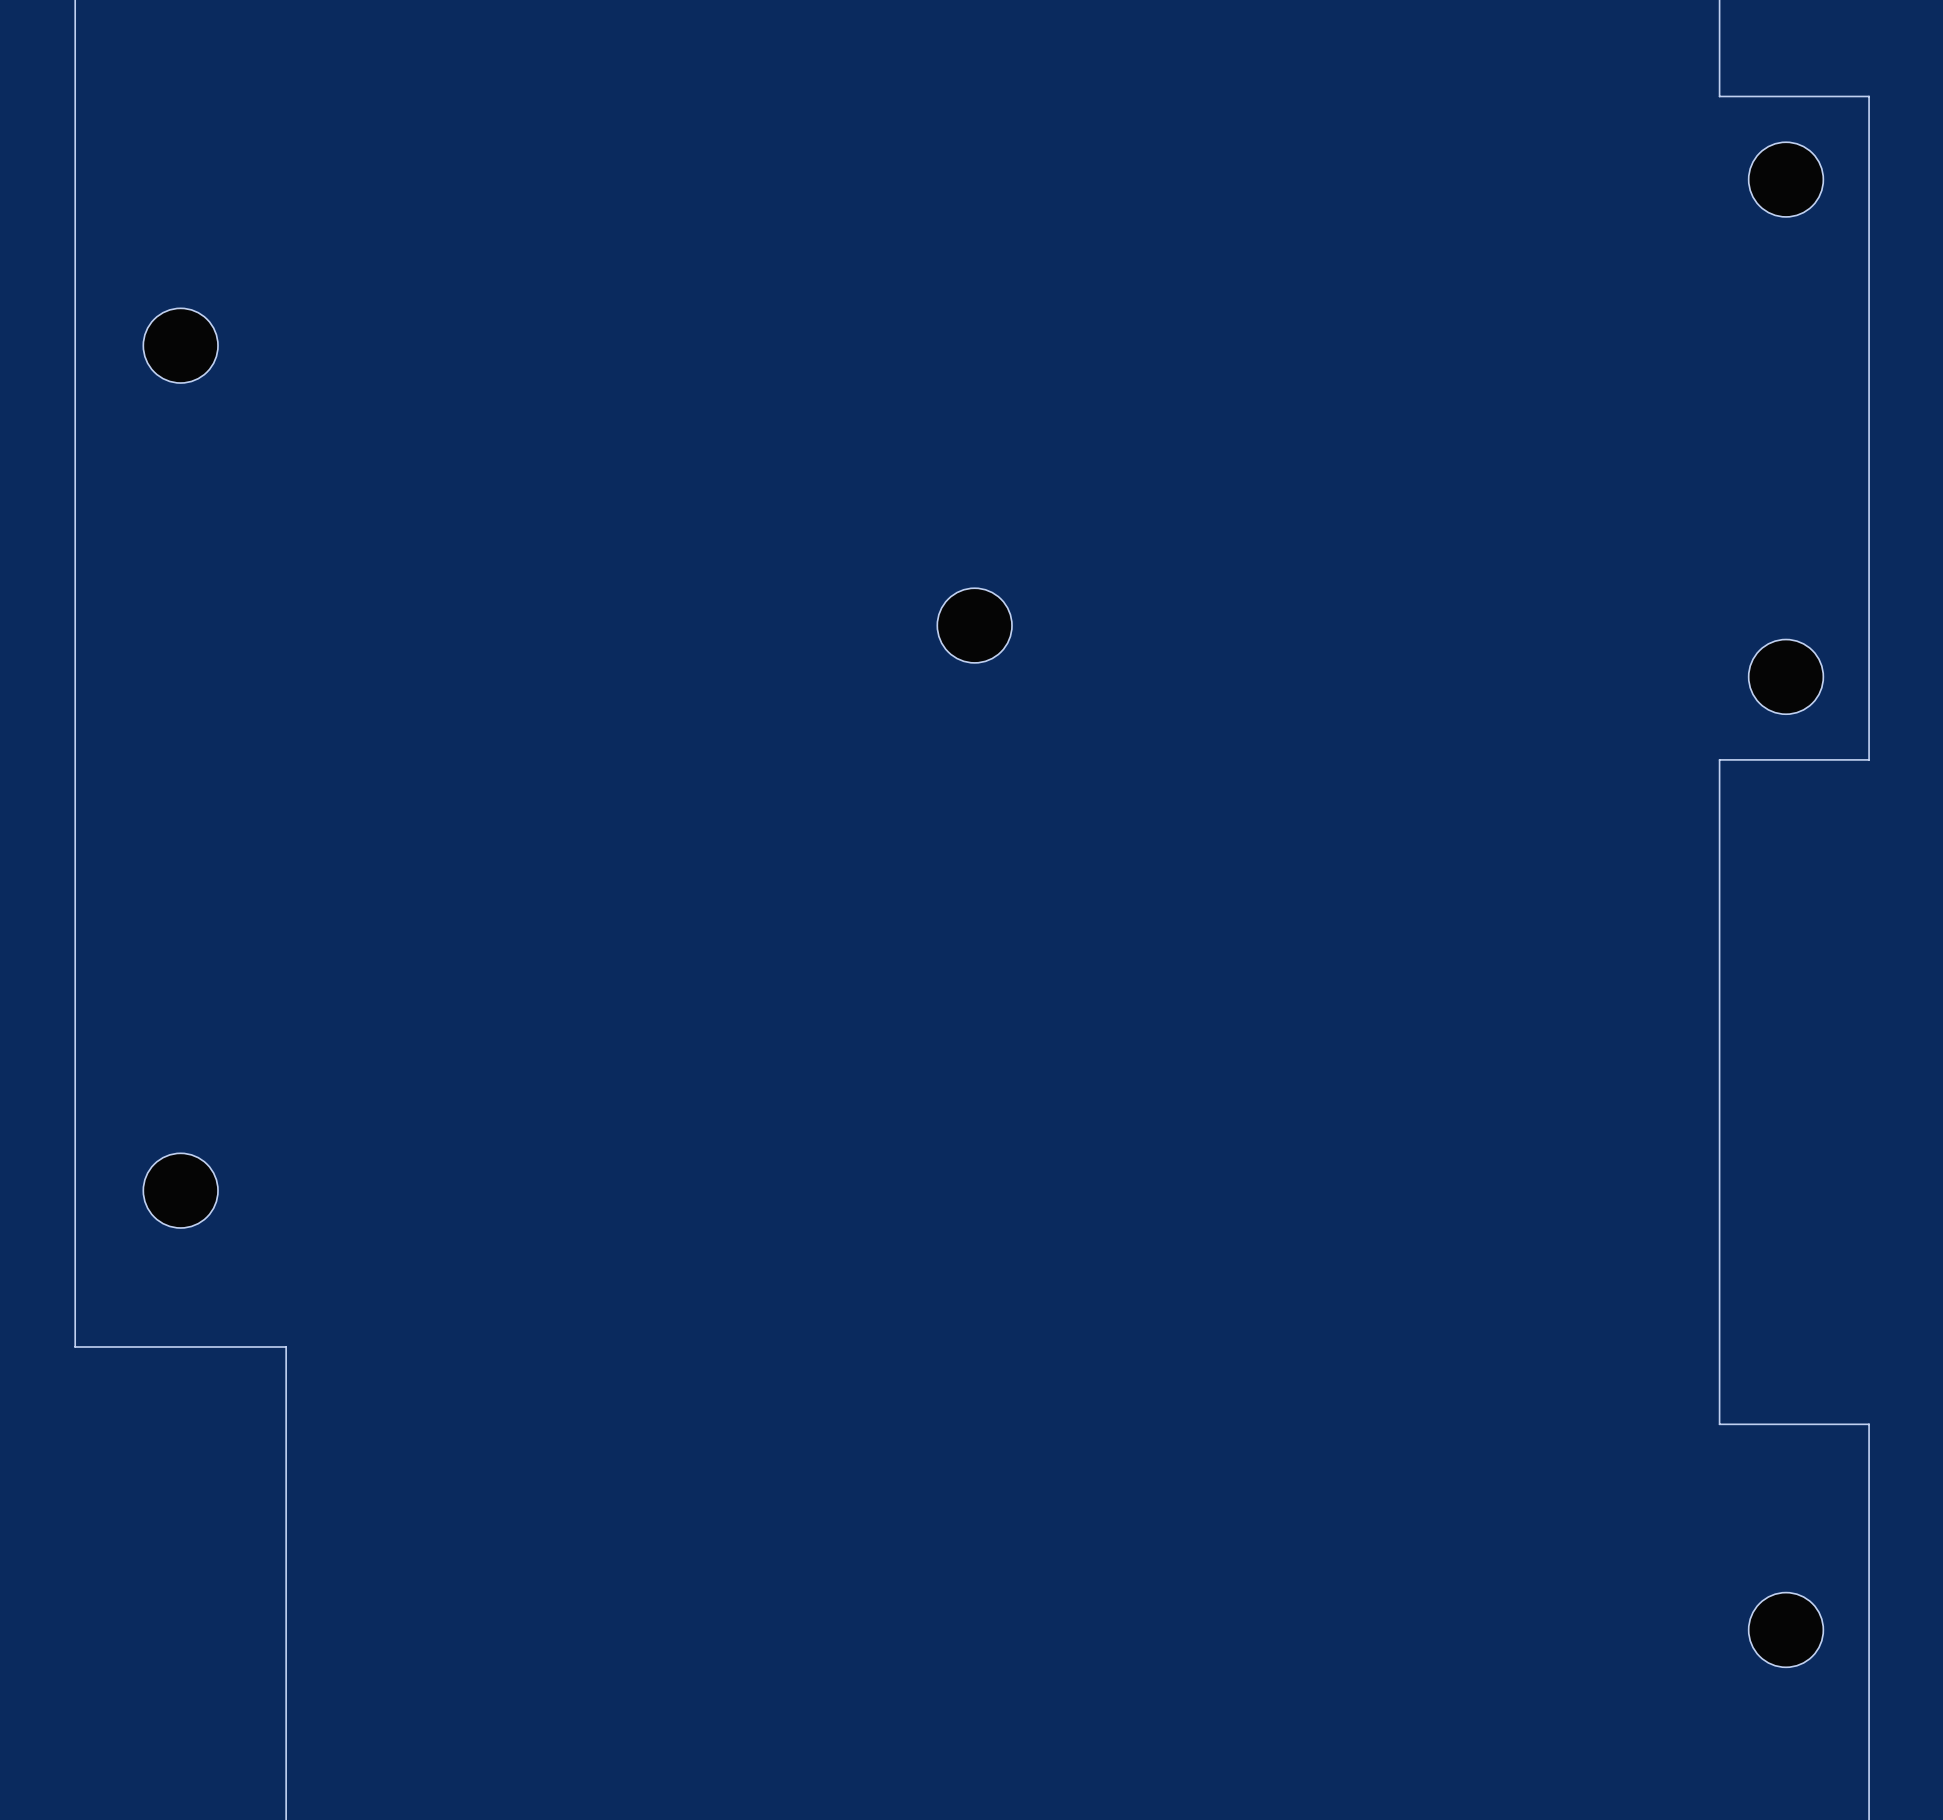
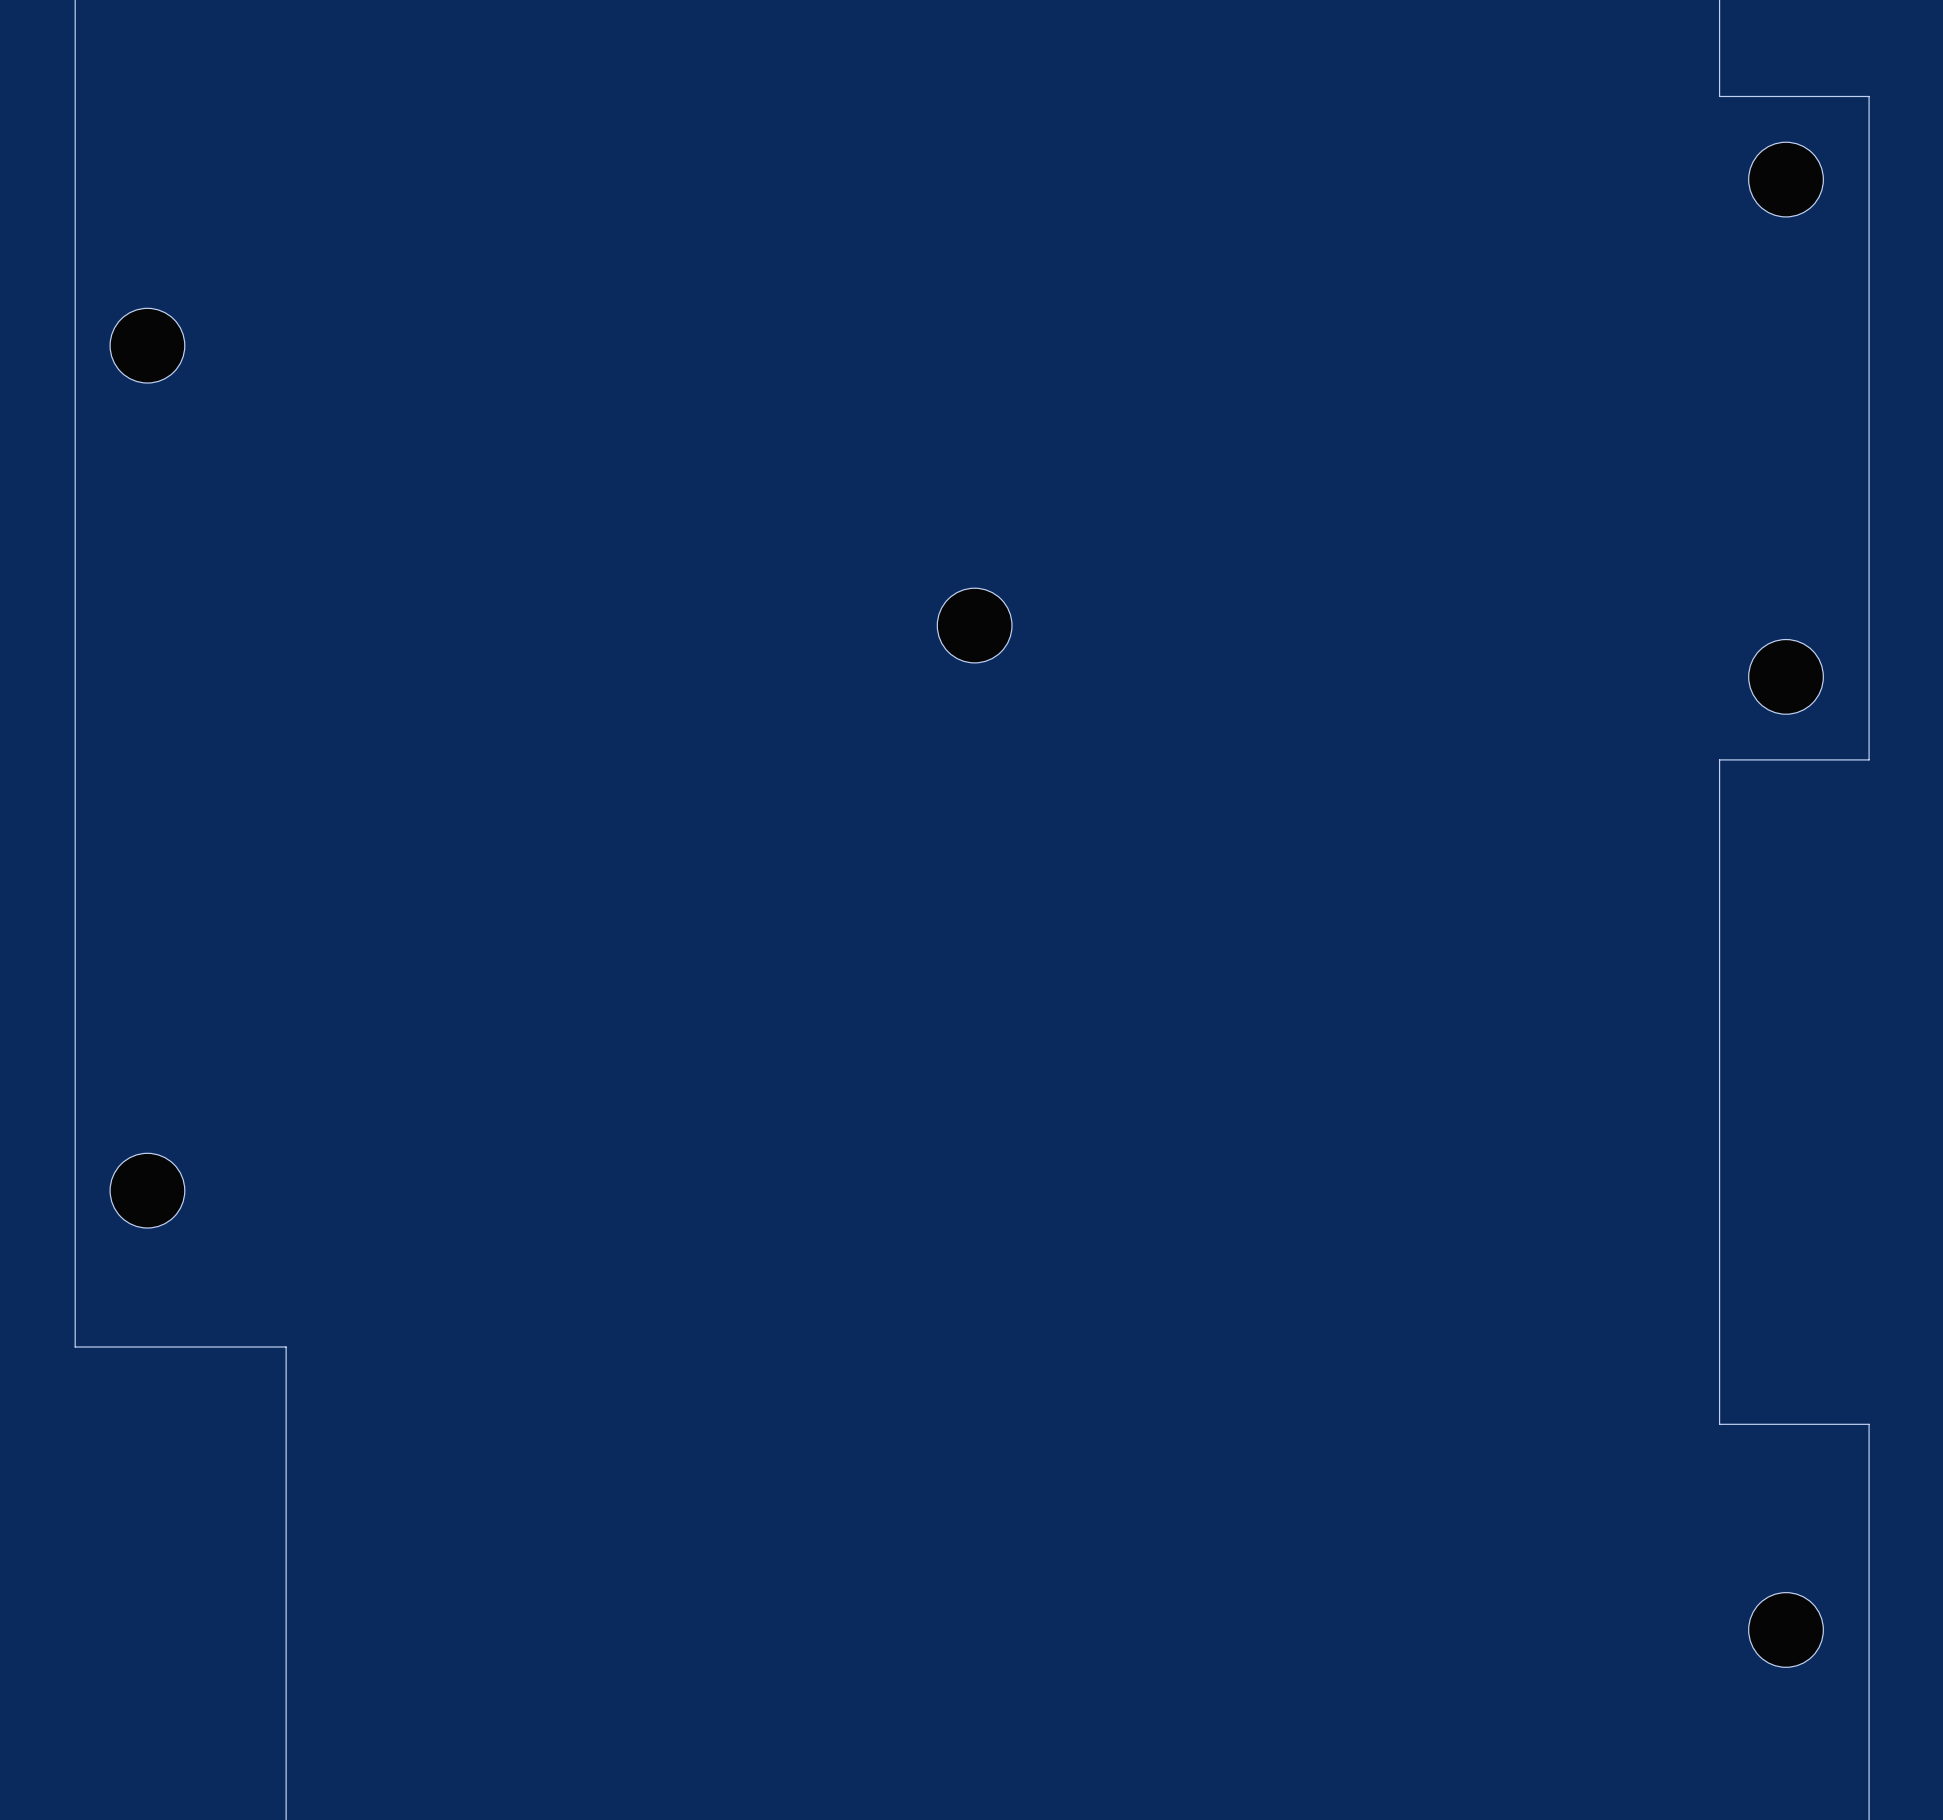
hole position: (180, 345) -> (147, 345)
hole position: (180, 1190) -> (147, 1190)

